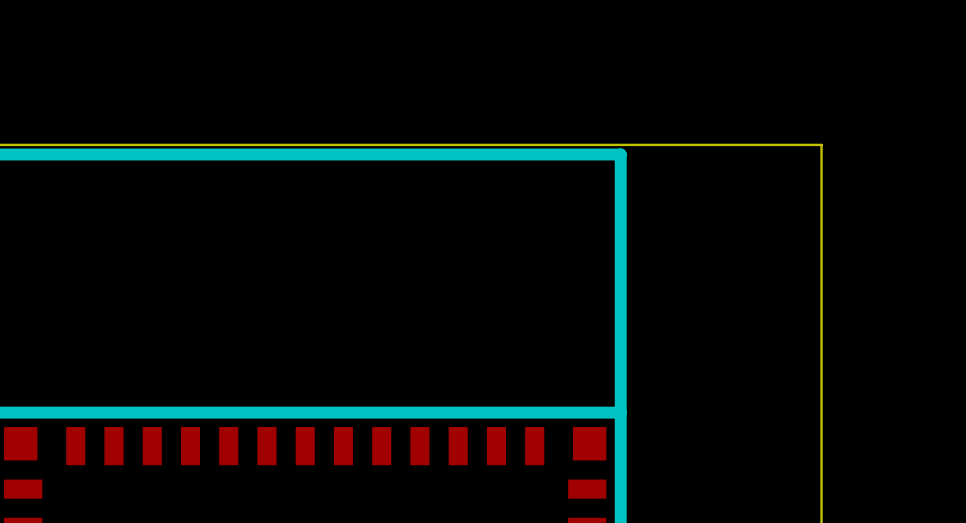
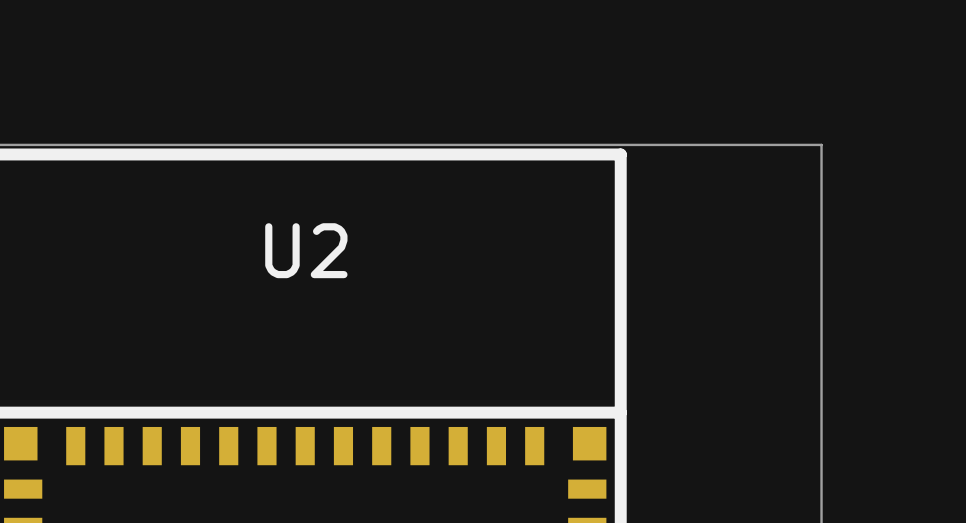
U2 name: none -> U2 (306, 250)

